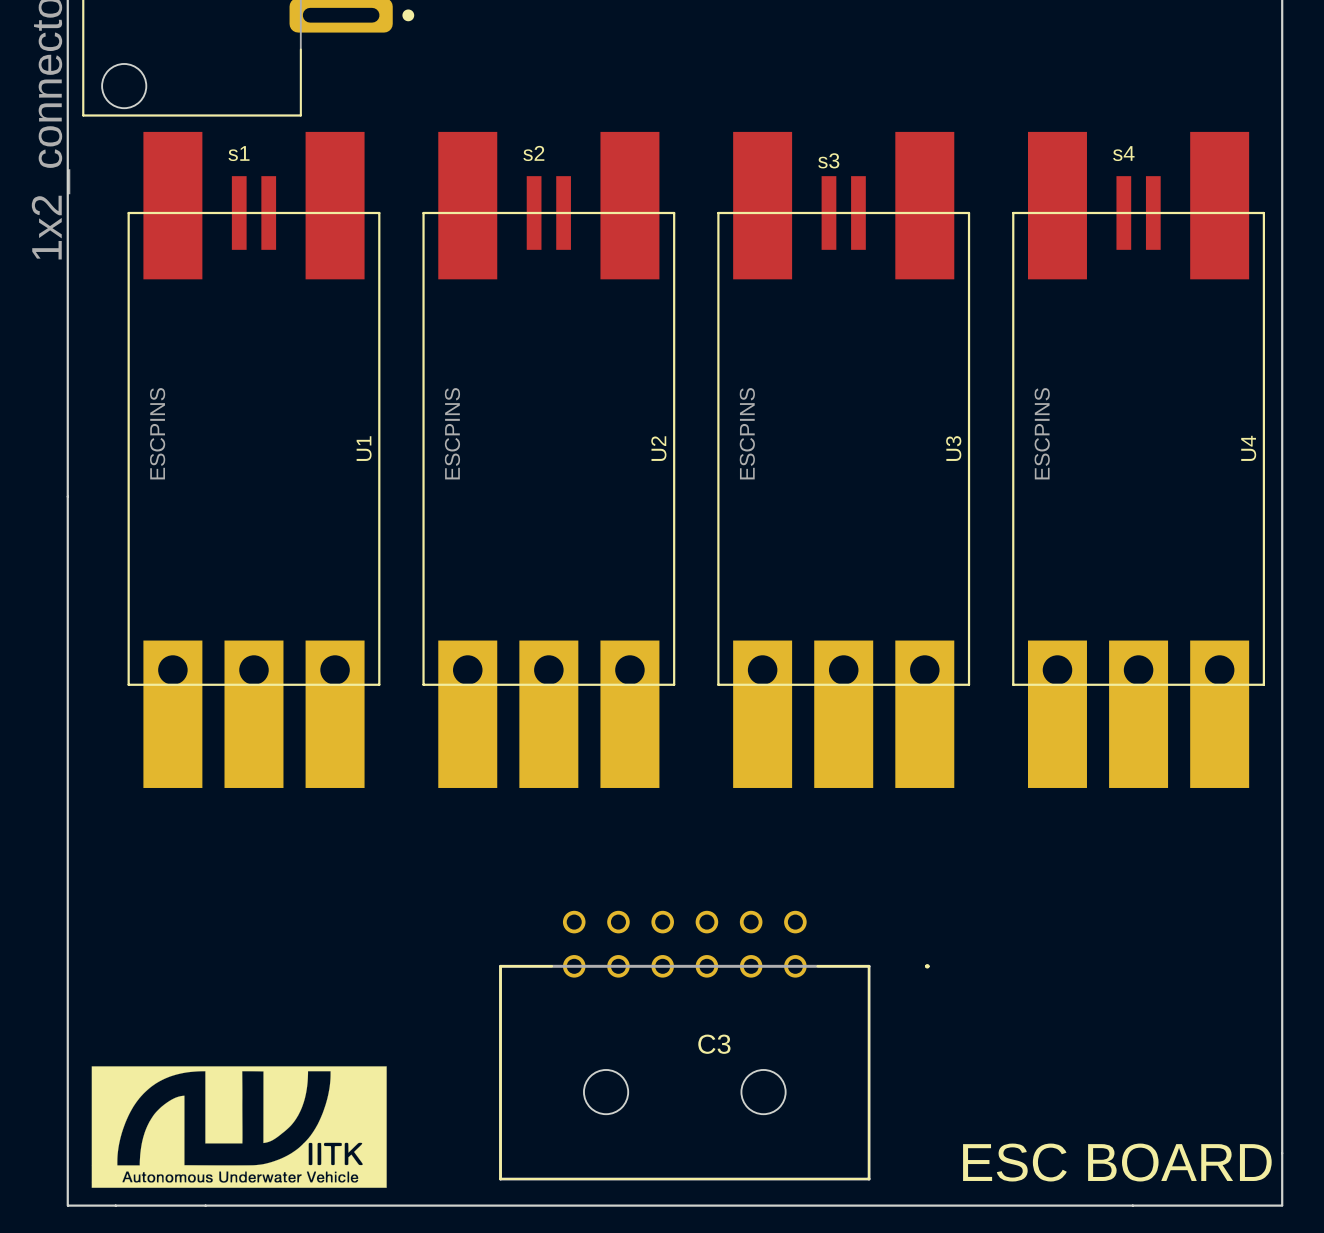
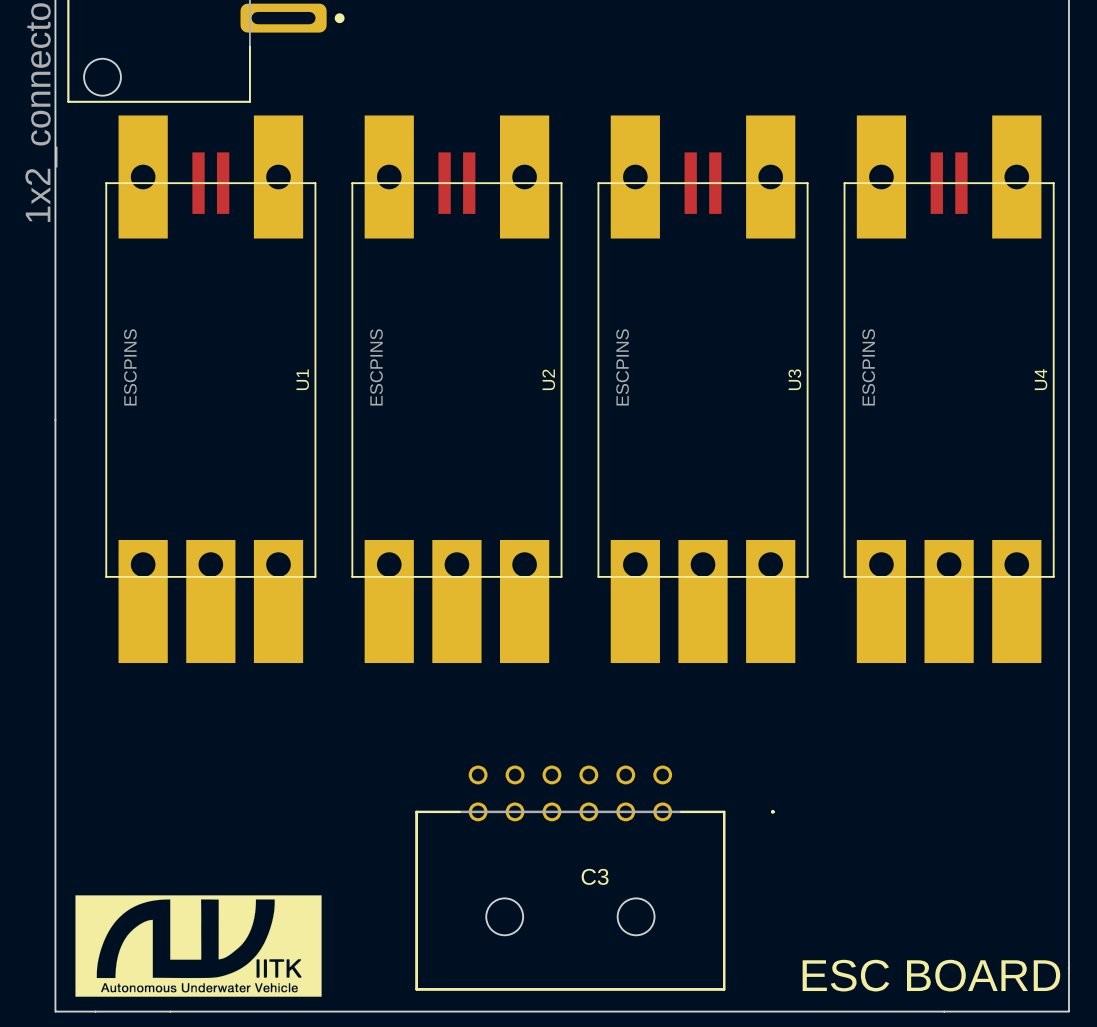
U1 footprint: [127, 131, 381, 788] -> [105, 115, 317, 664]
U2 footprint: [422, 131, 676, 788] -> [351, 115, 563, 664]
U3 footprint: [717, 131, 971, 788] -> [597, 115, 809, 664]
U4 footprint: [1012, 131, 1265, 788] -> [843, 115, 1055, 664]
text: s1 (239, 153) -> none
text: s2 (533, 153) -> none
text: s4 (1123, 153) -> none
text: s3 (828, 160) -> none

